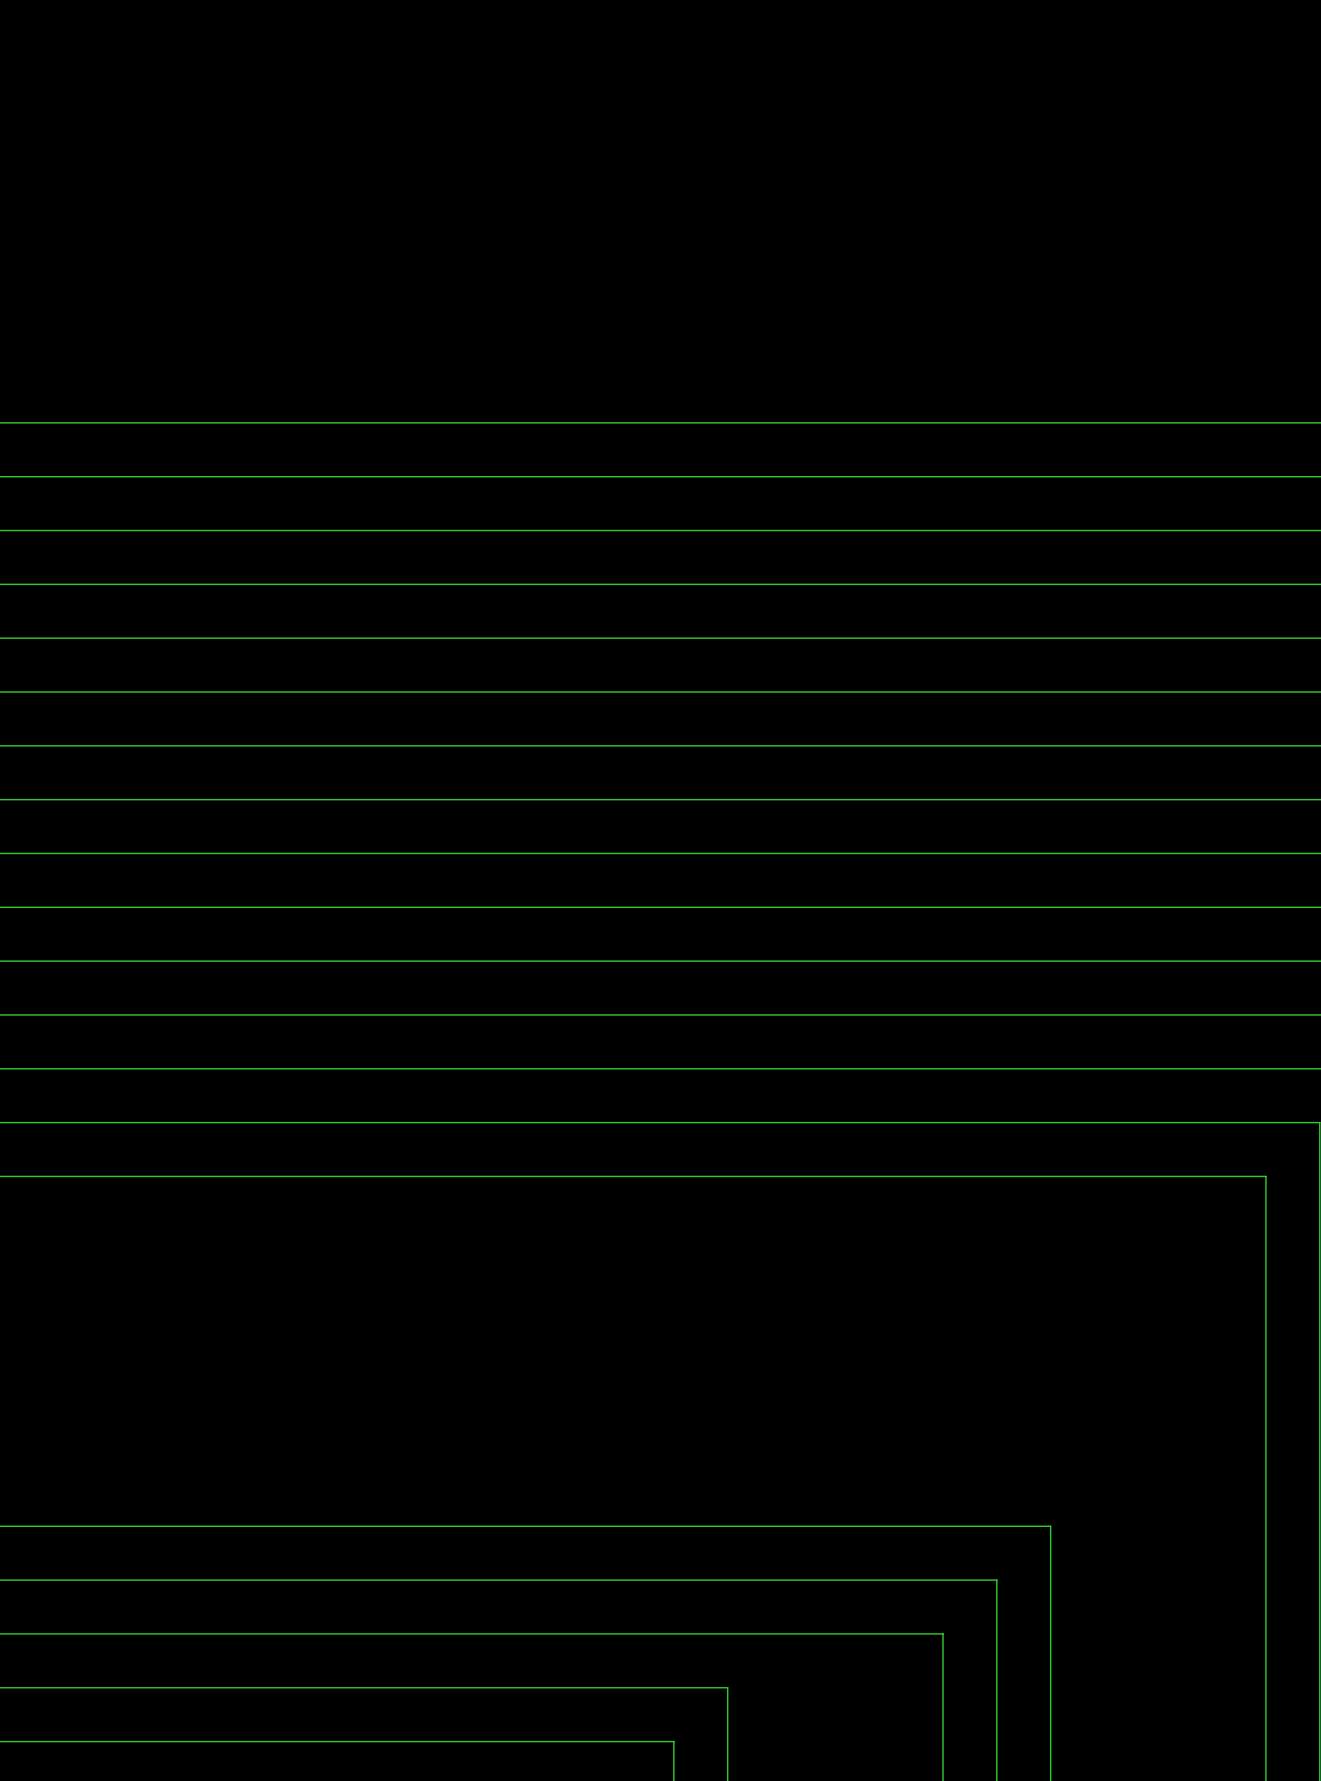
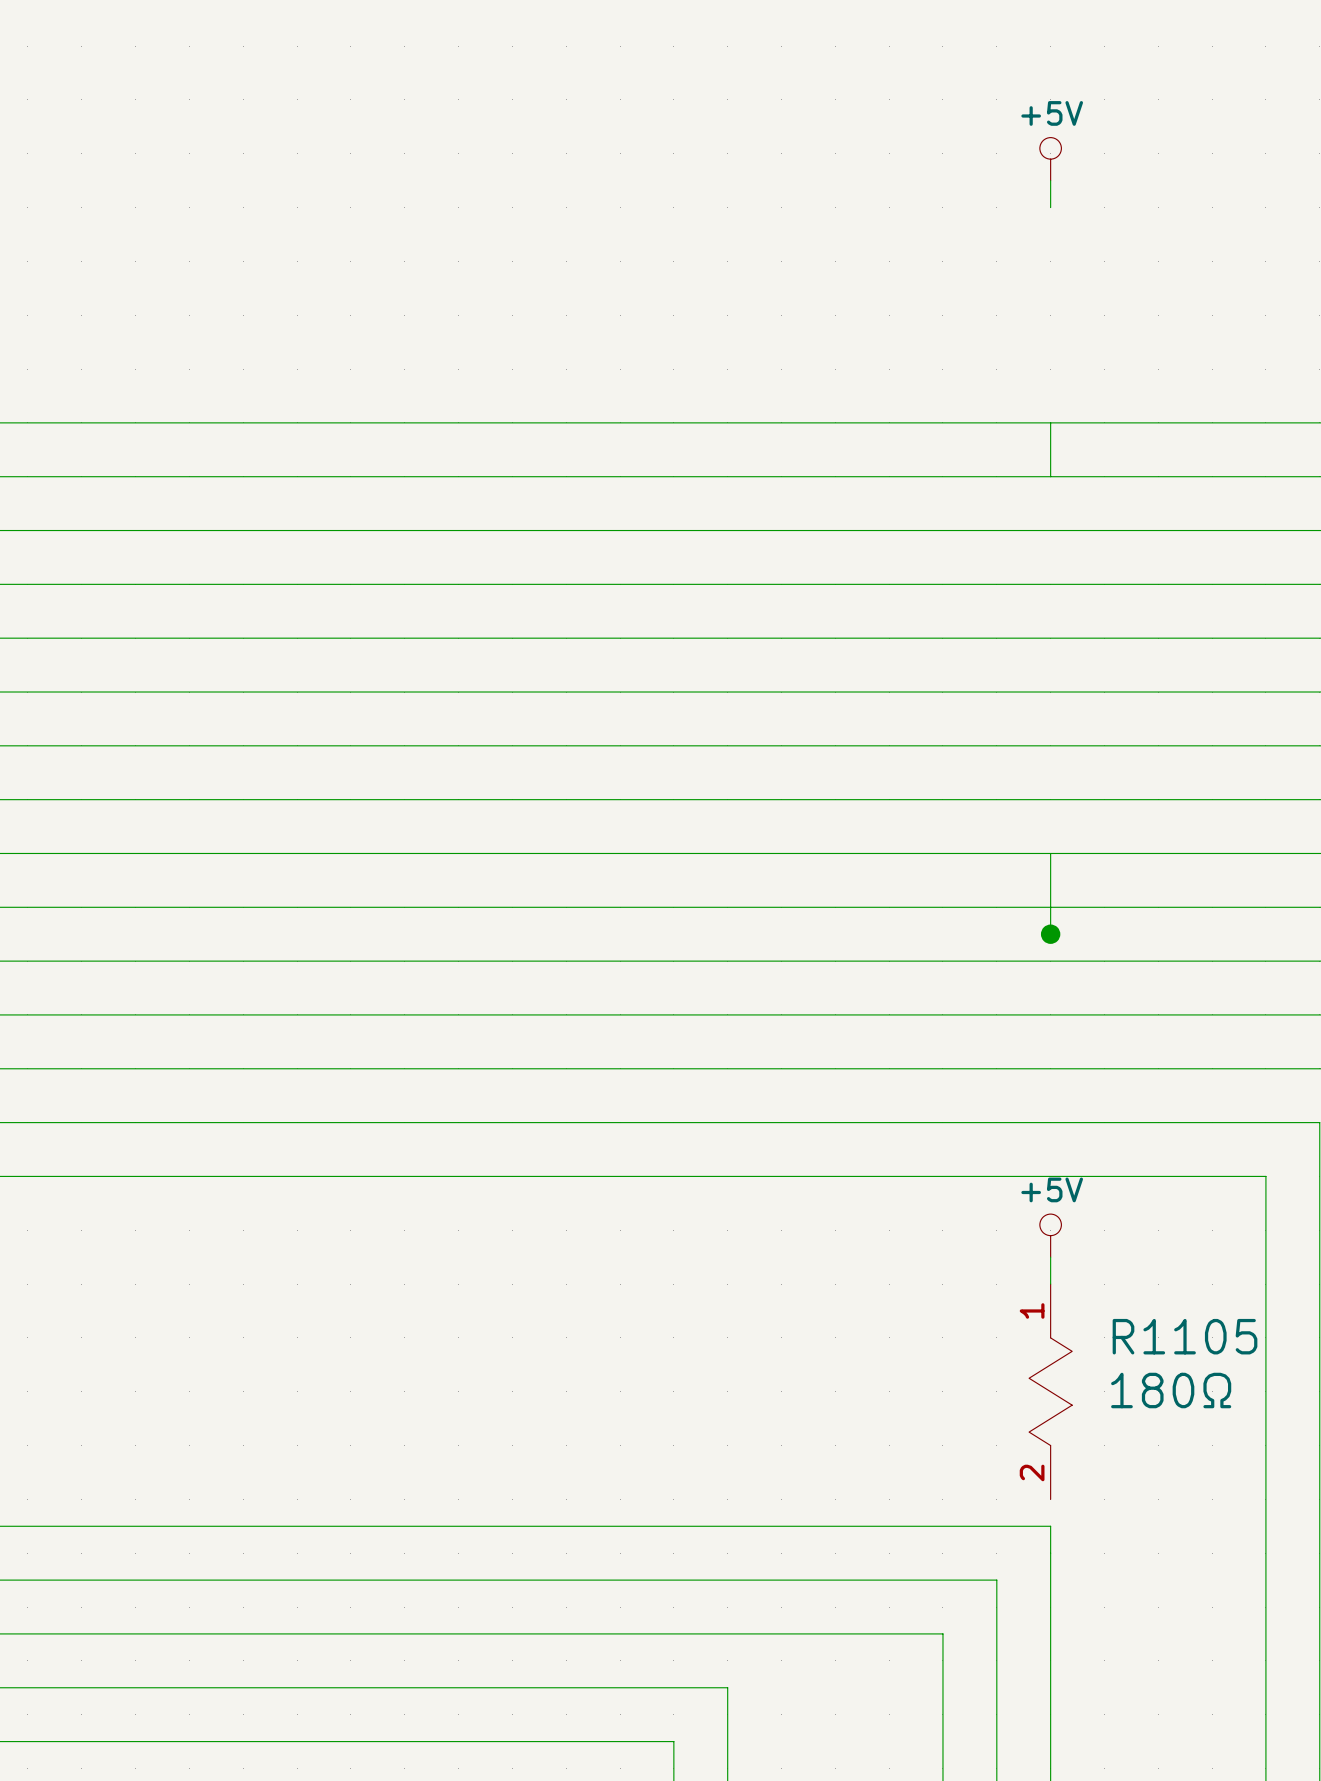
power symbol: none -> +5V (1050, 159)
wire: none -> (1050, 180) (1050, 207)
wire: none -> (1050, 422) (1050, 476)
wire: none -> (1050, 853) (1050, 934)
junction: none -> (1050, 934)
power symbol: none -> +5V (1050, 1235)
wire: none -> (1050, 1257) (1050, 1284)
R1105: none -> 180Ω (1050, 1391)

